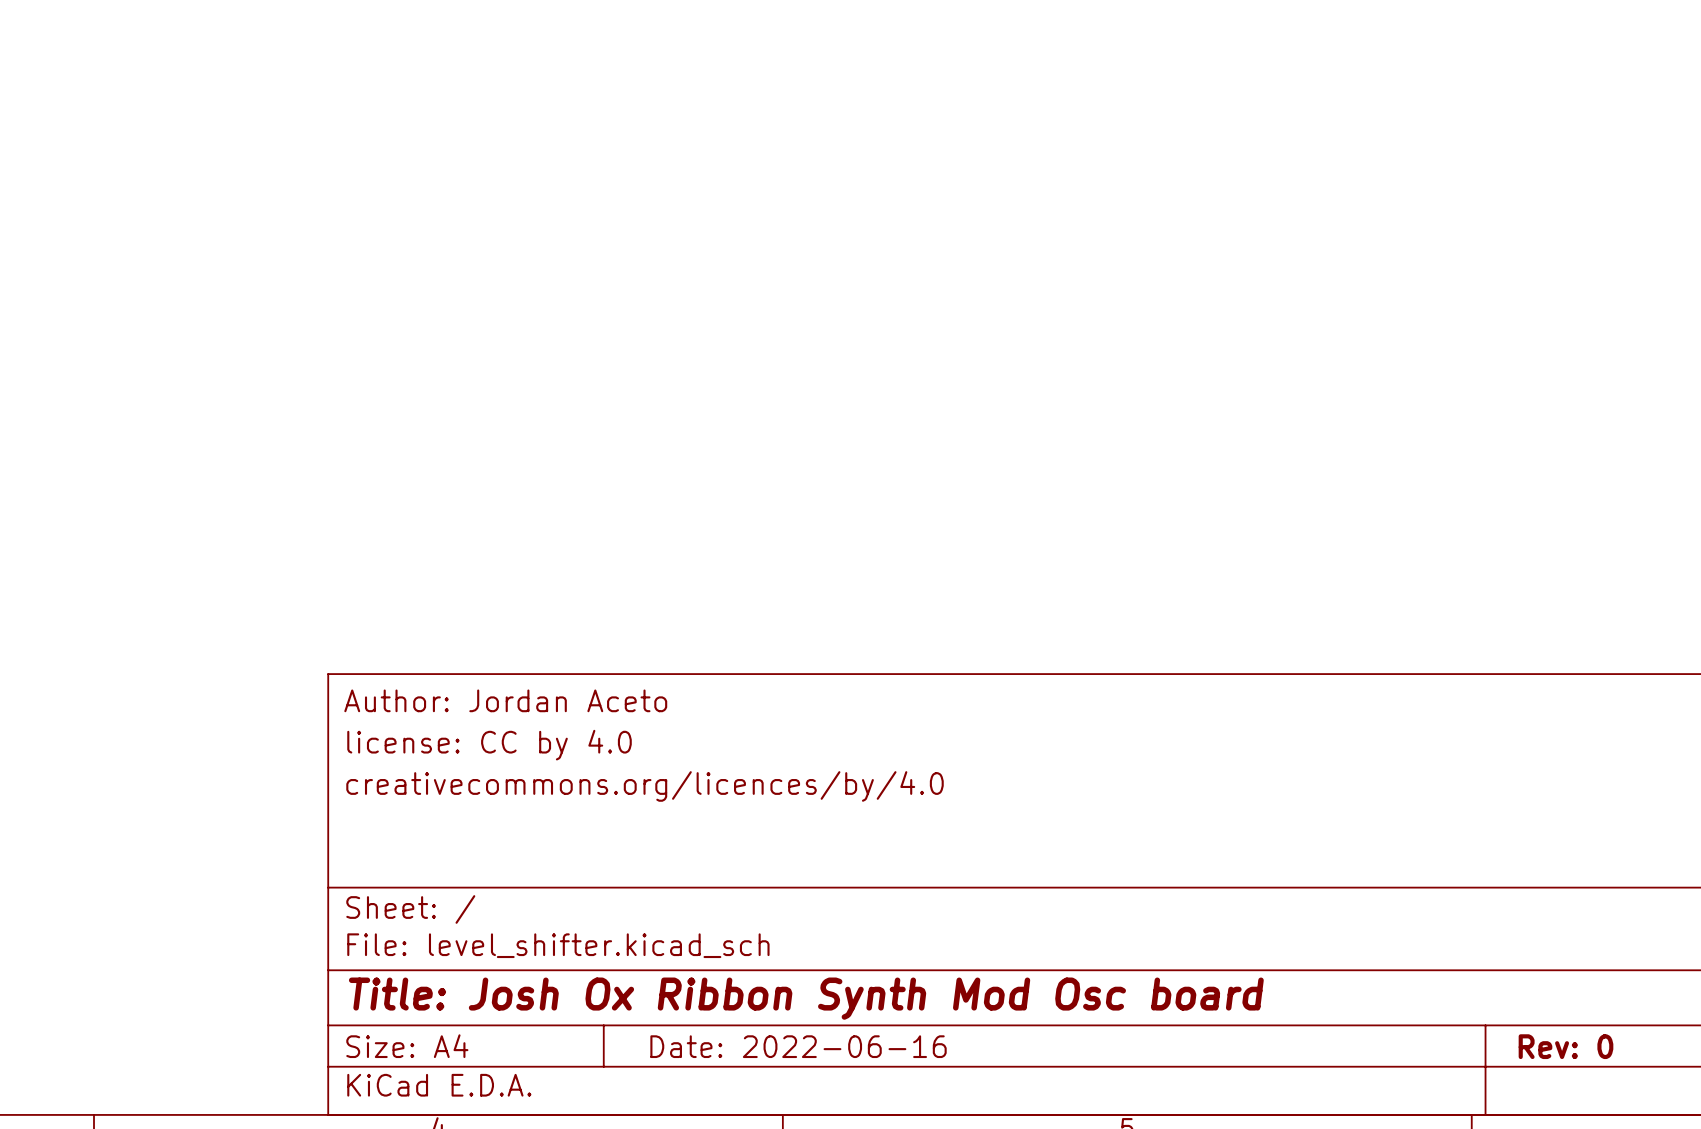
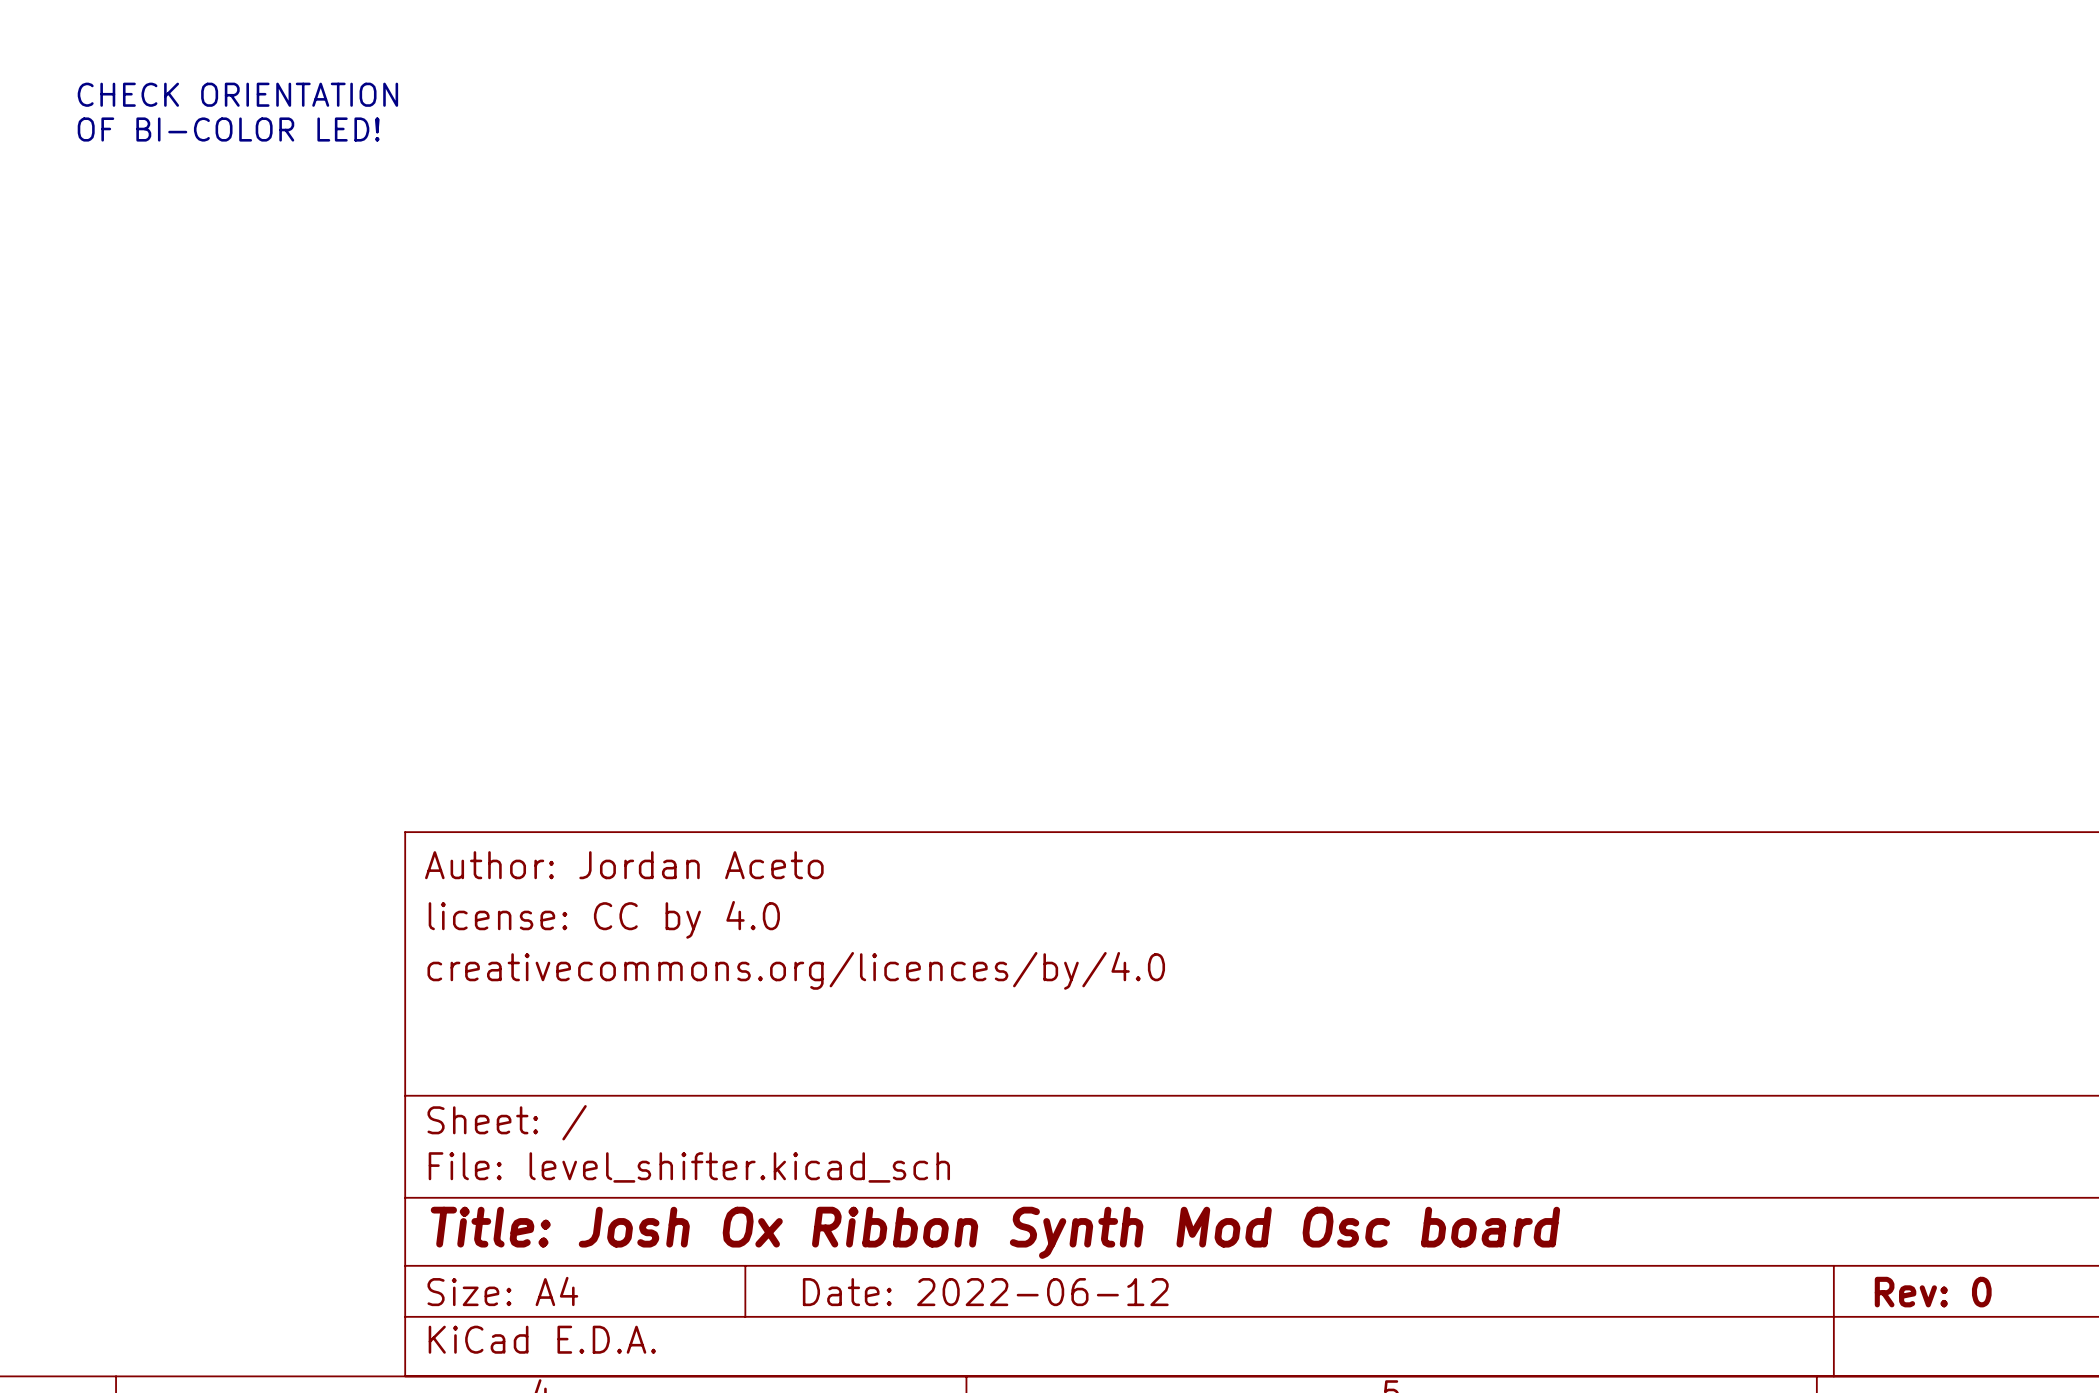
text: none -> CHECK ORIENTATION (237, 94)
text: none -> OF BI-COLOR LED! (228, 129)
title block: Date: 2022-06-16 (798, 1046) -> Date: 2022-06-12 (985, 1292)

